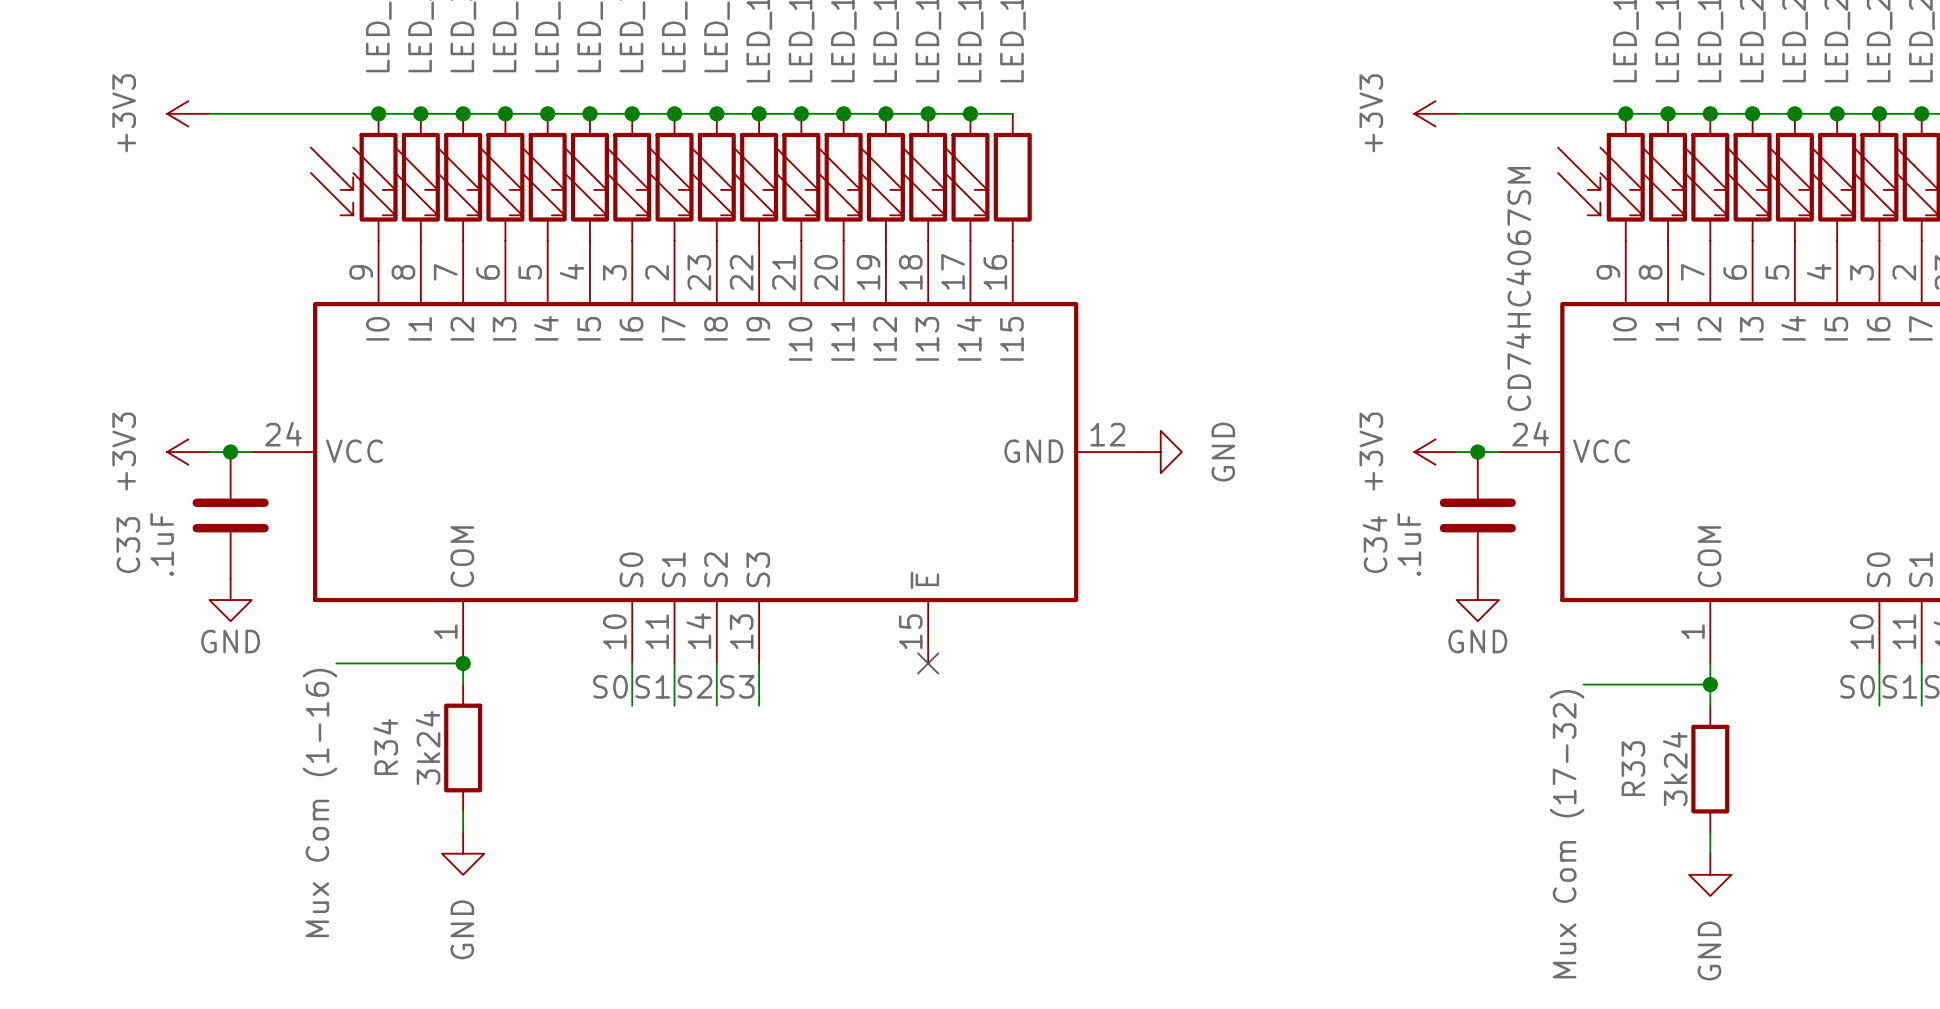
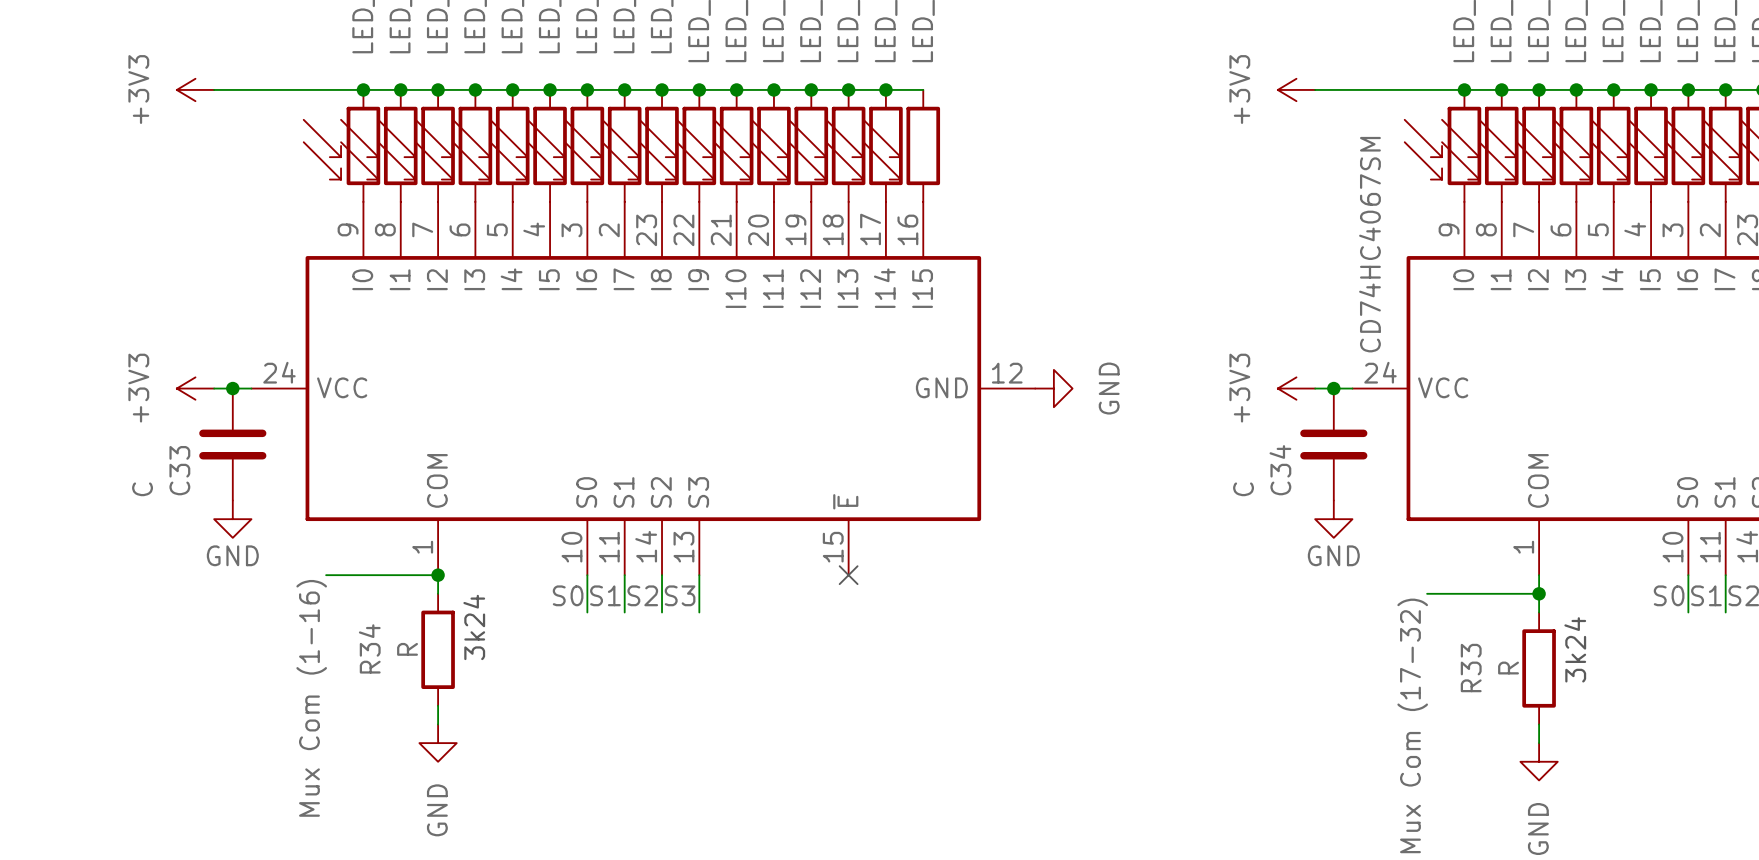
C33 value: .1uF (162, 544) -> C (142, 489)
C34 name position: C34 (1375, 544) -> C34 (1280, 470)
C34 value: .1uF (1409, 544) -> C (1243, 489)
C33 name position: C33 (128, 545) -> C33 (179, 470)
text: none -> 3k24 (474, 627)
R34 value: 3k24 (428, 748) -> R (407, 649)
text: none -> 3k24 (1575, 649)
R33 value: 3k24 (1675, 769) -> R (1508, 668)

